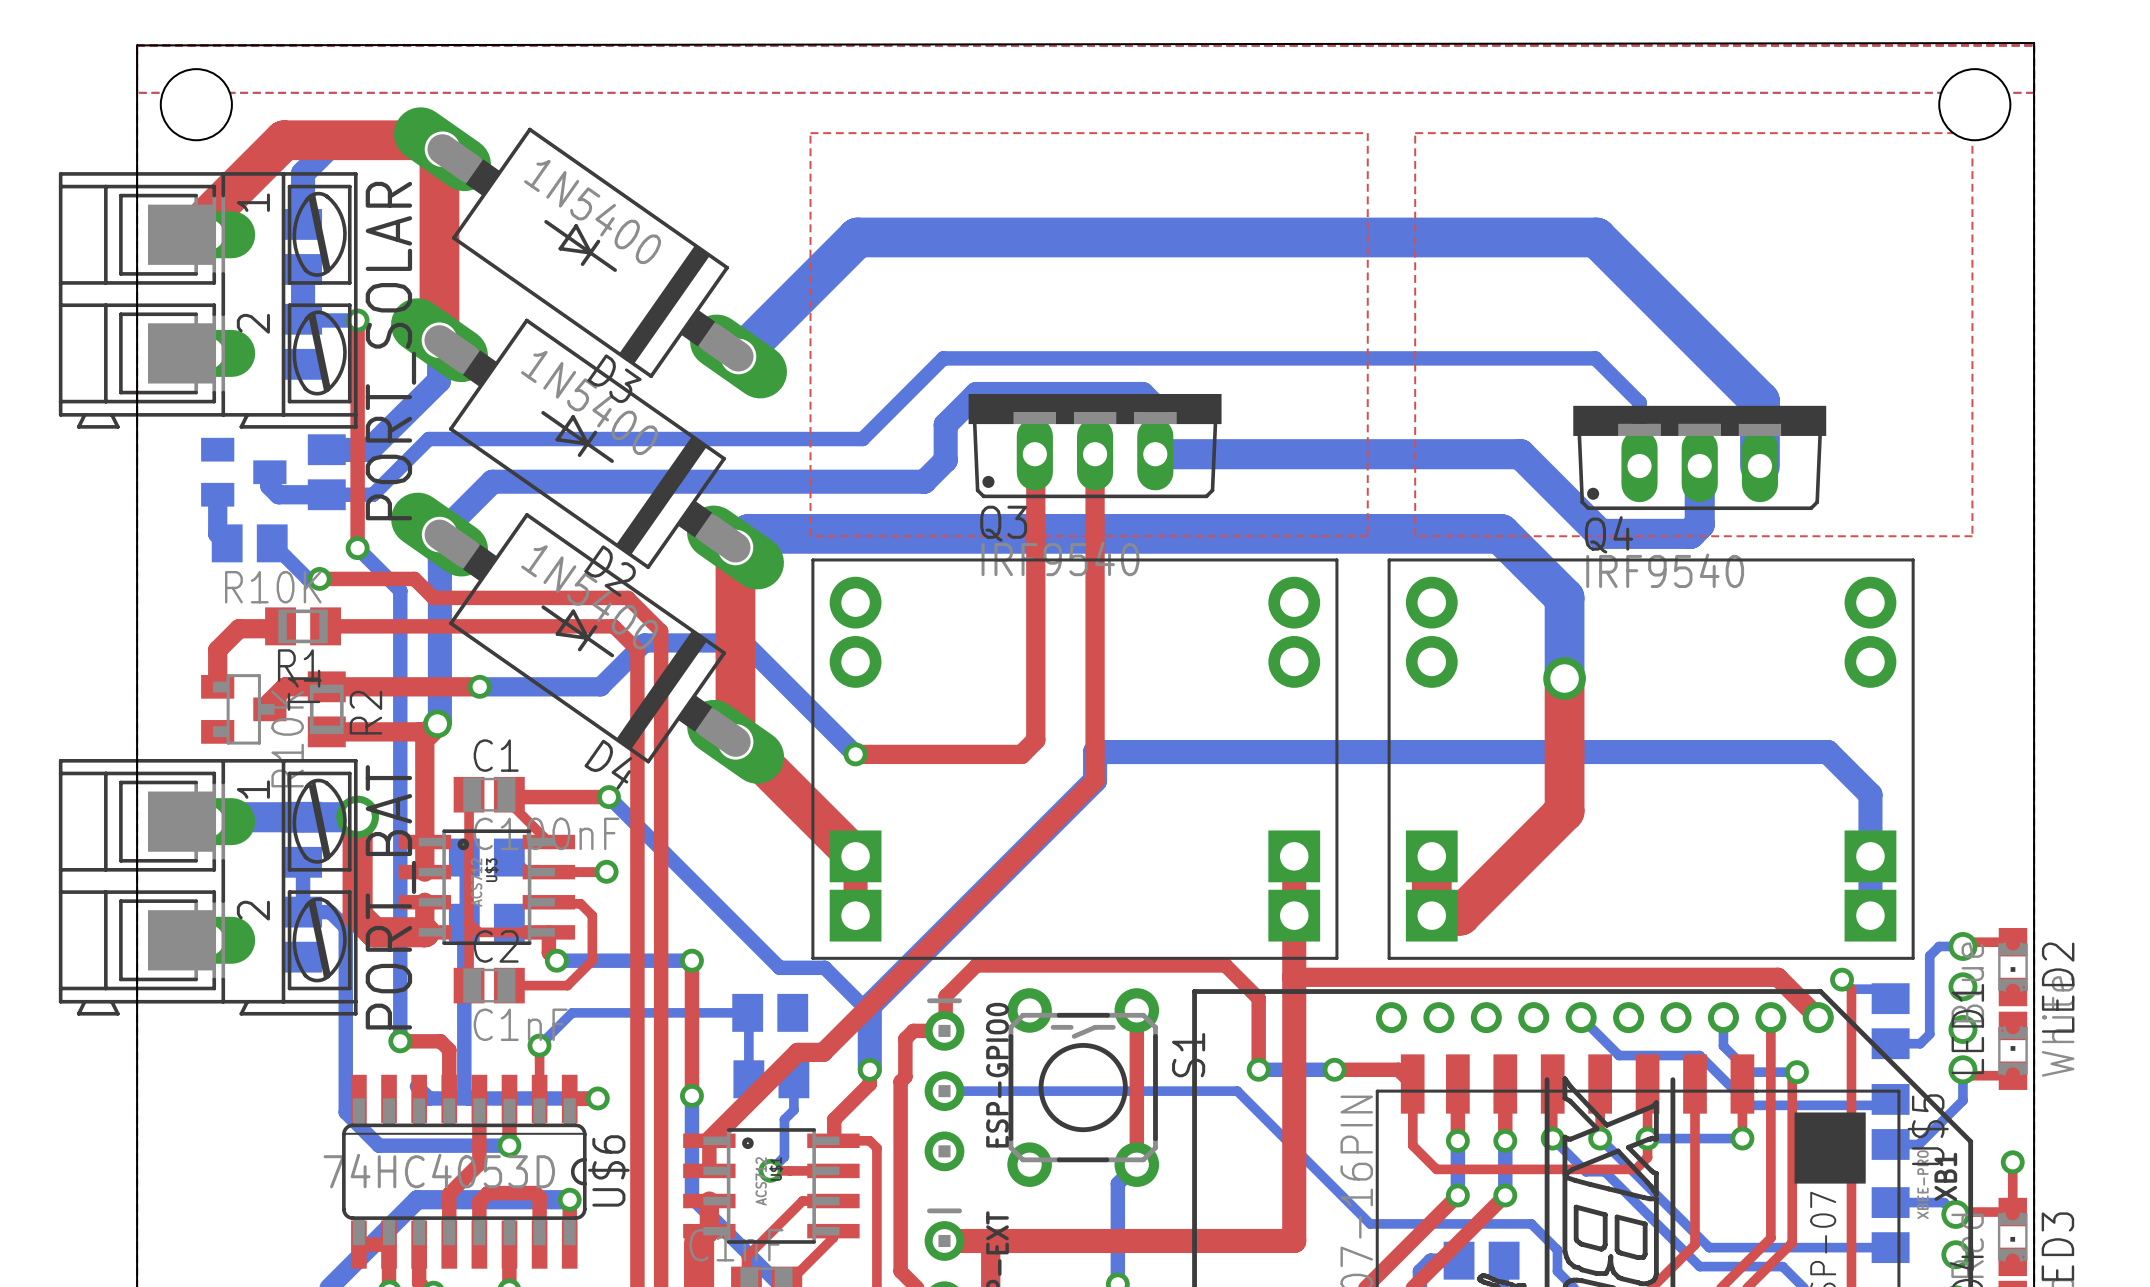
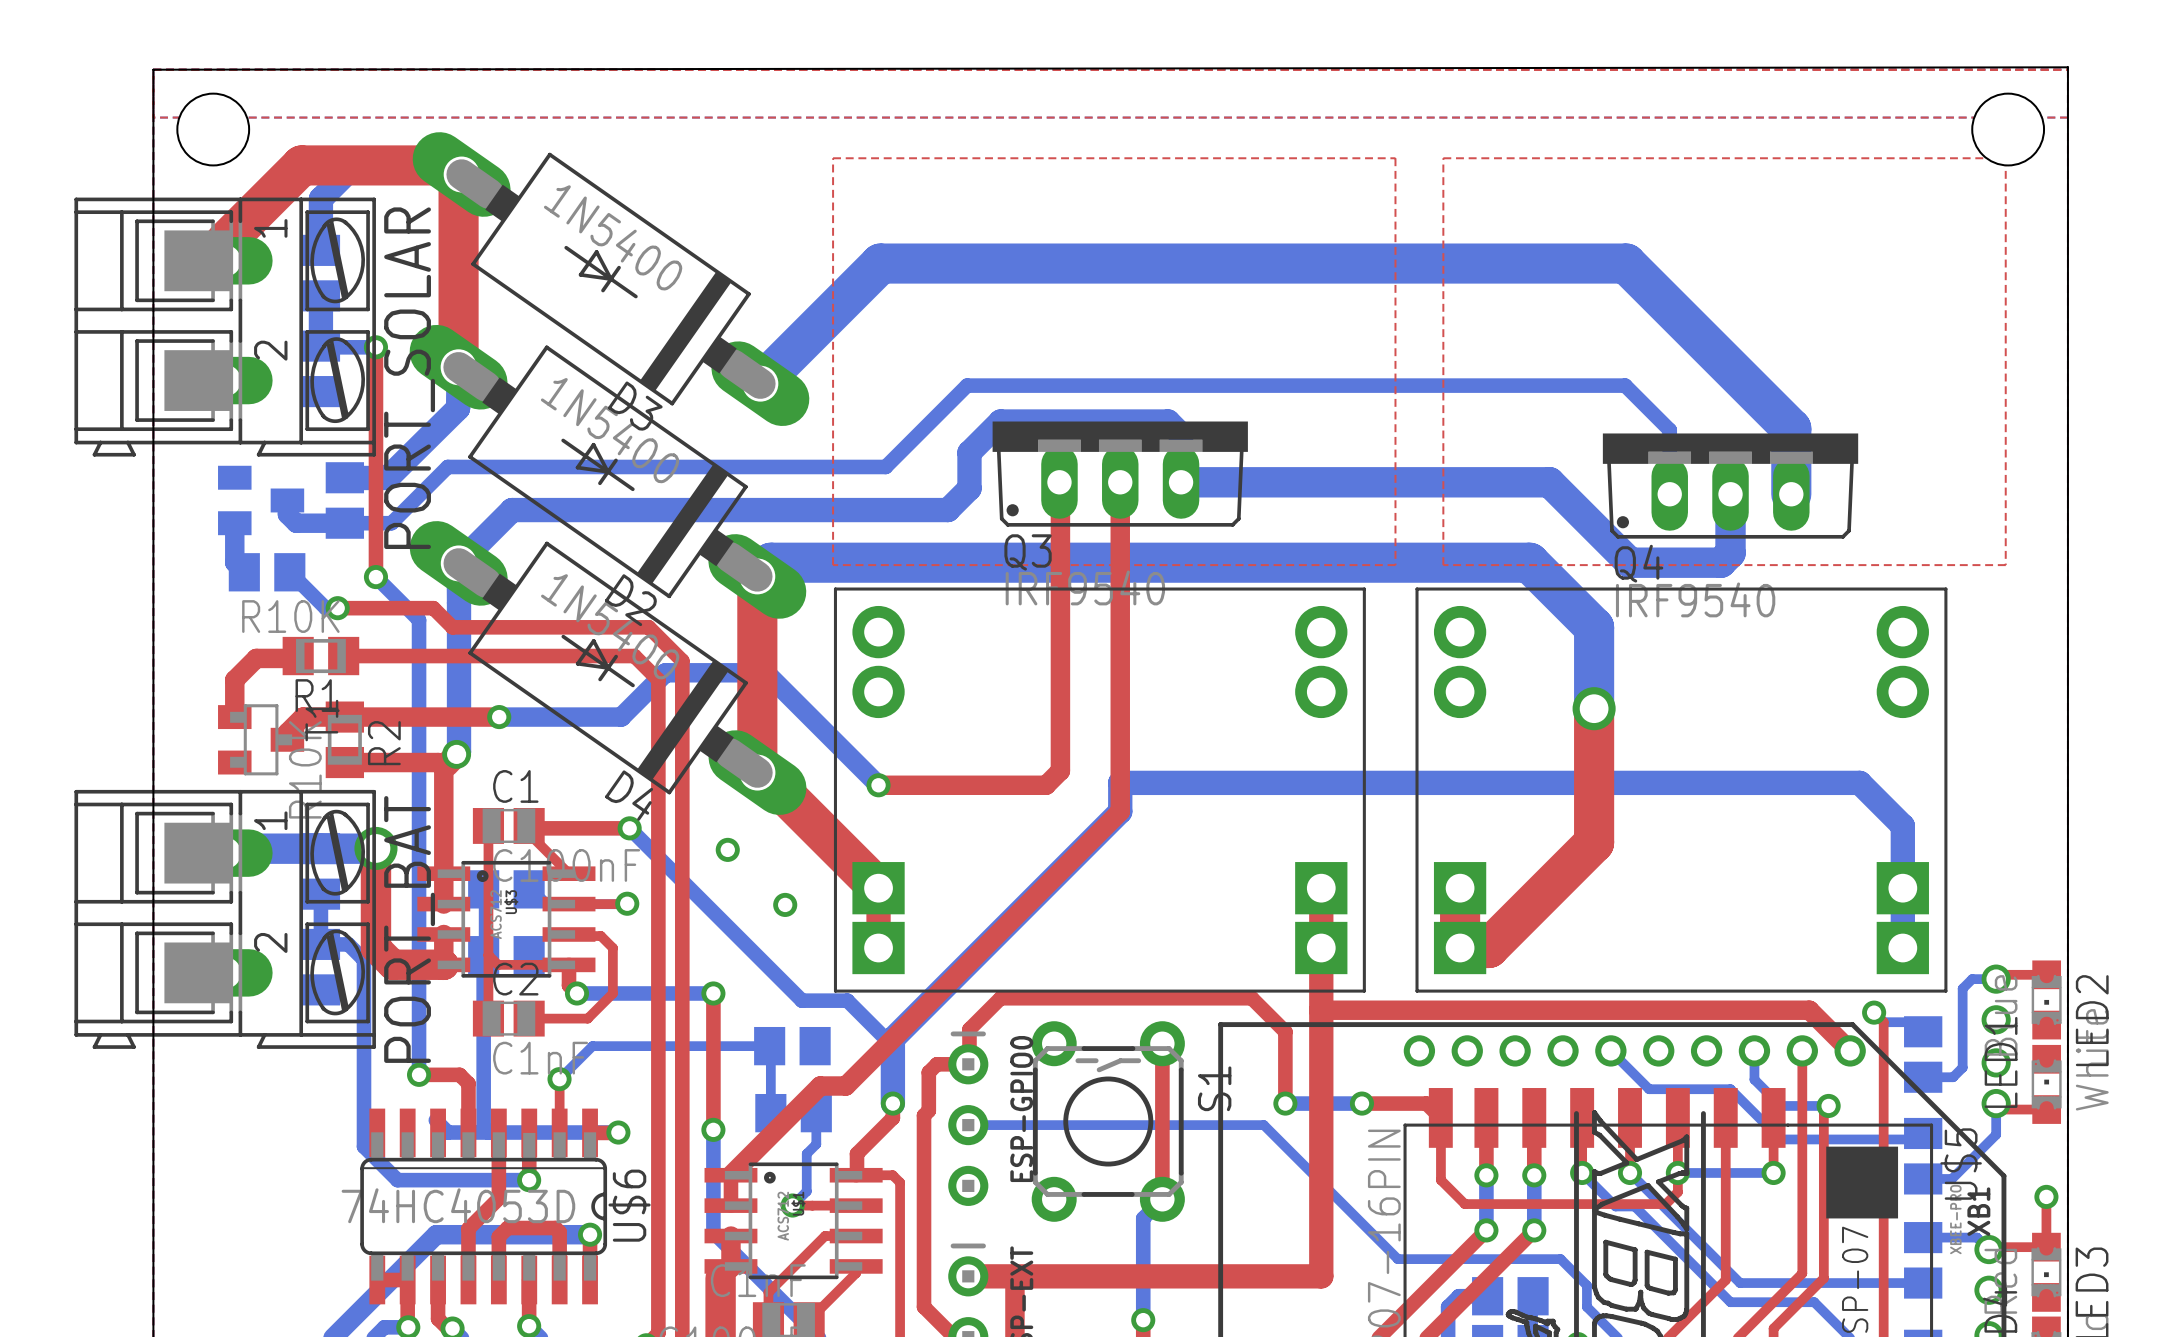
via: none -> (727, 849)
via: none -> (785, 904)

